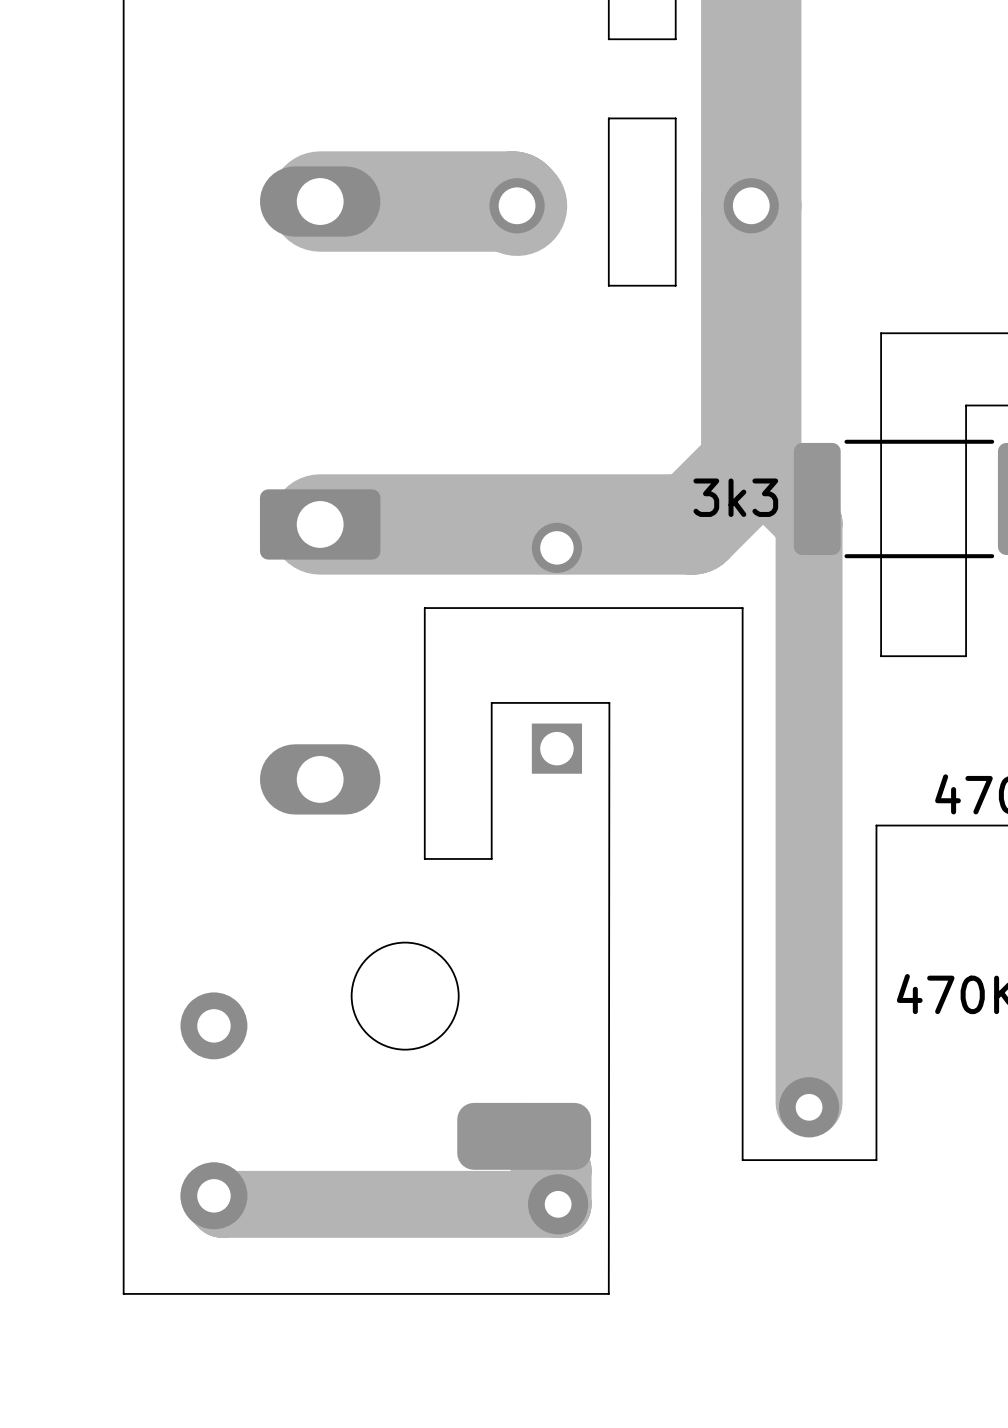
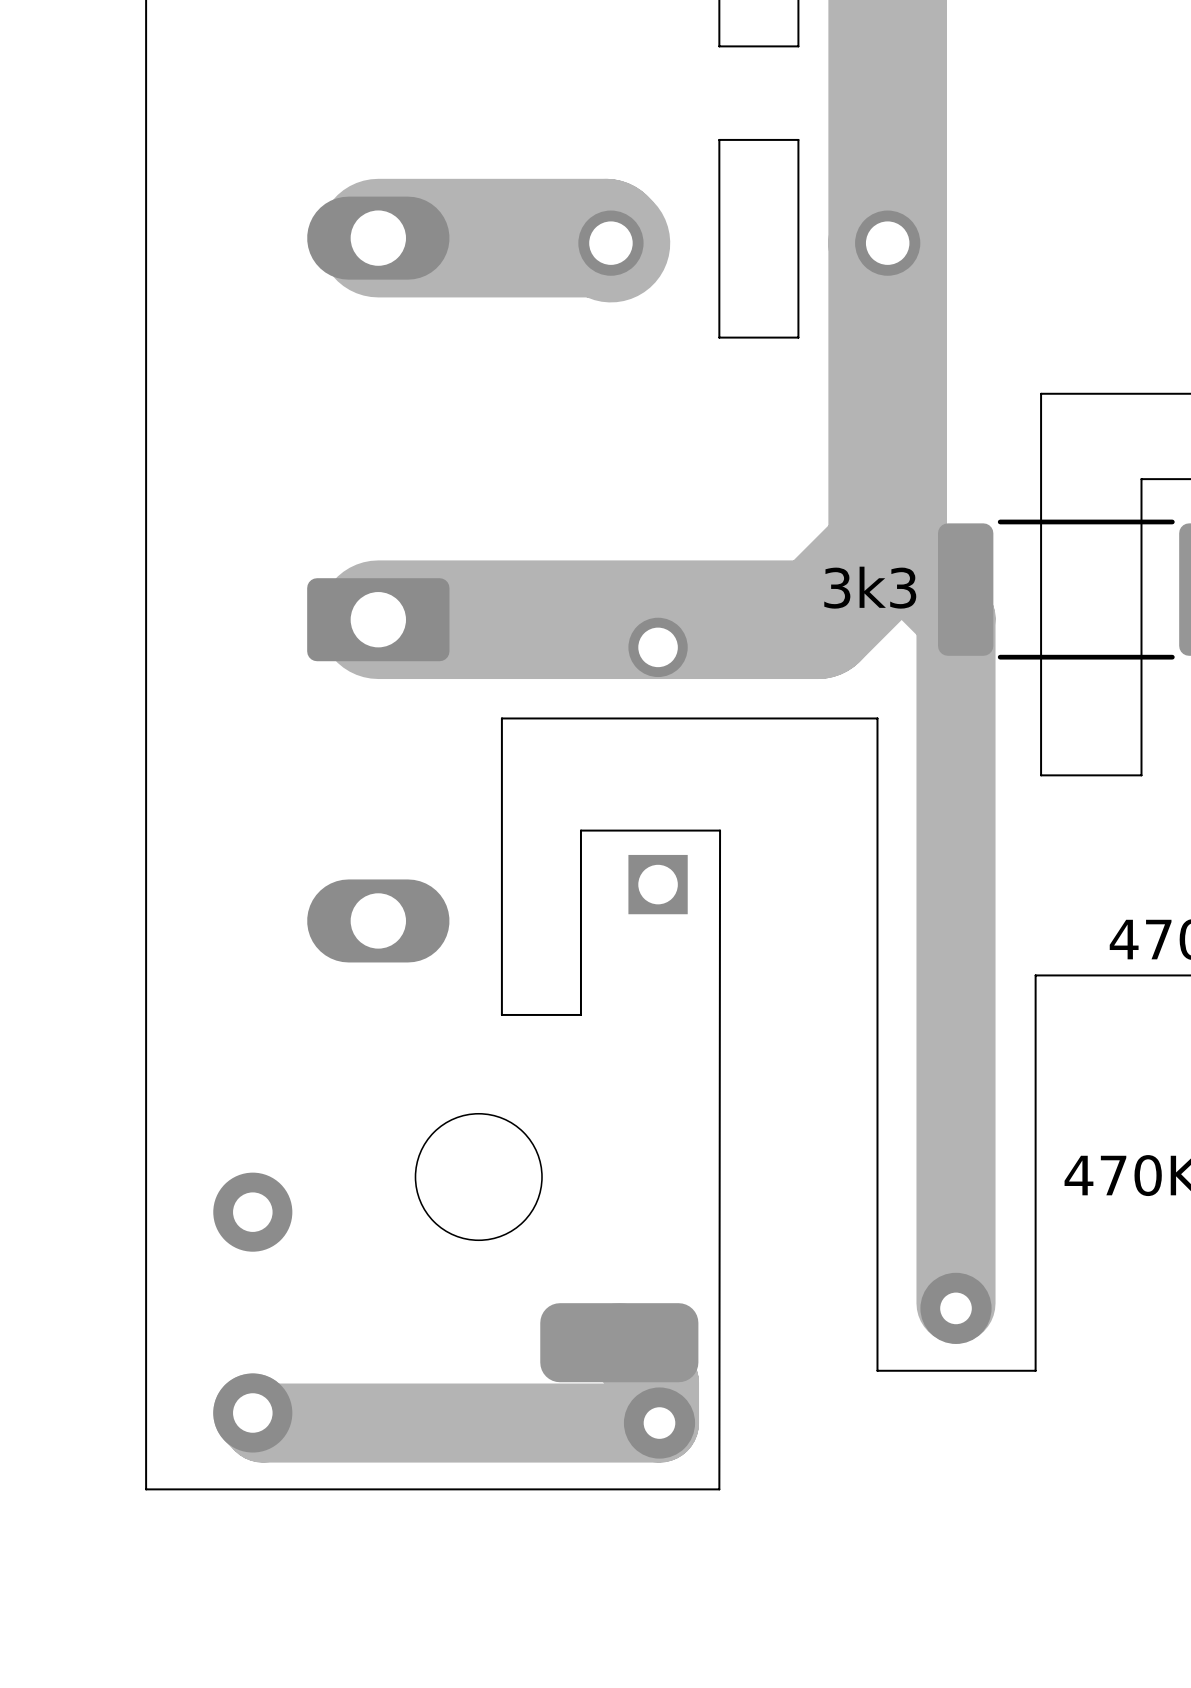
board edge: (609, 702) (608, 1293) (123, 1293) (123, 1260) -> (720, 830) (719, 1489) (146, 1489)

